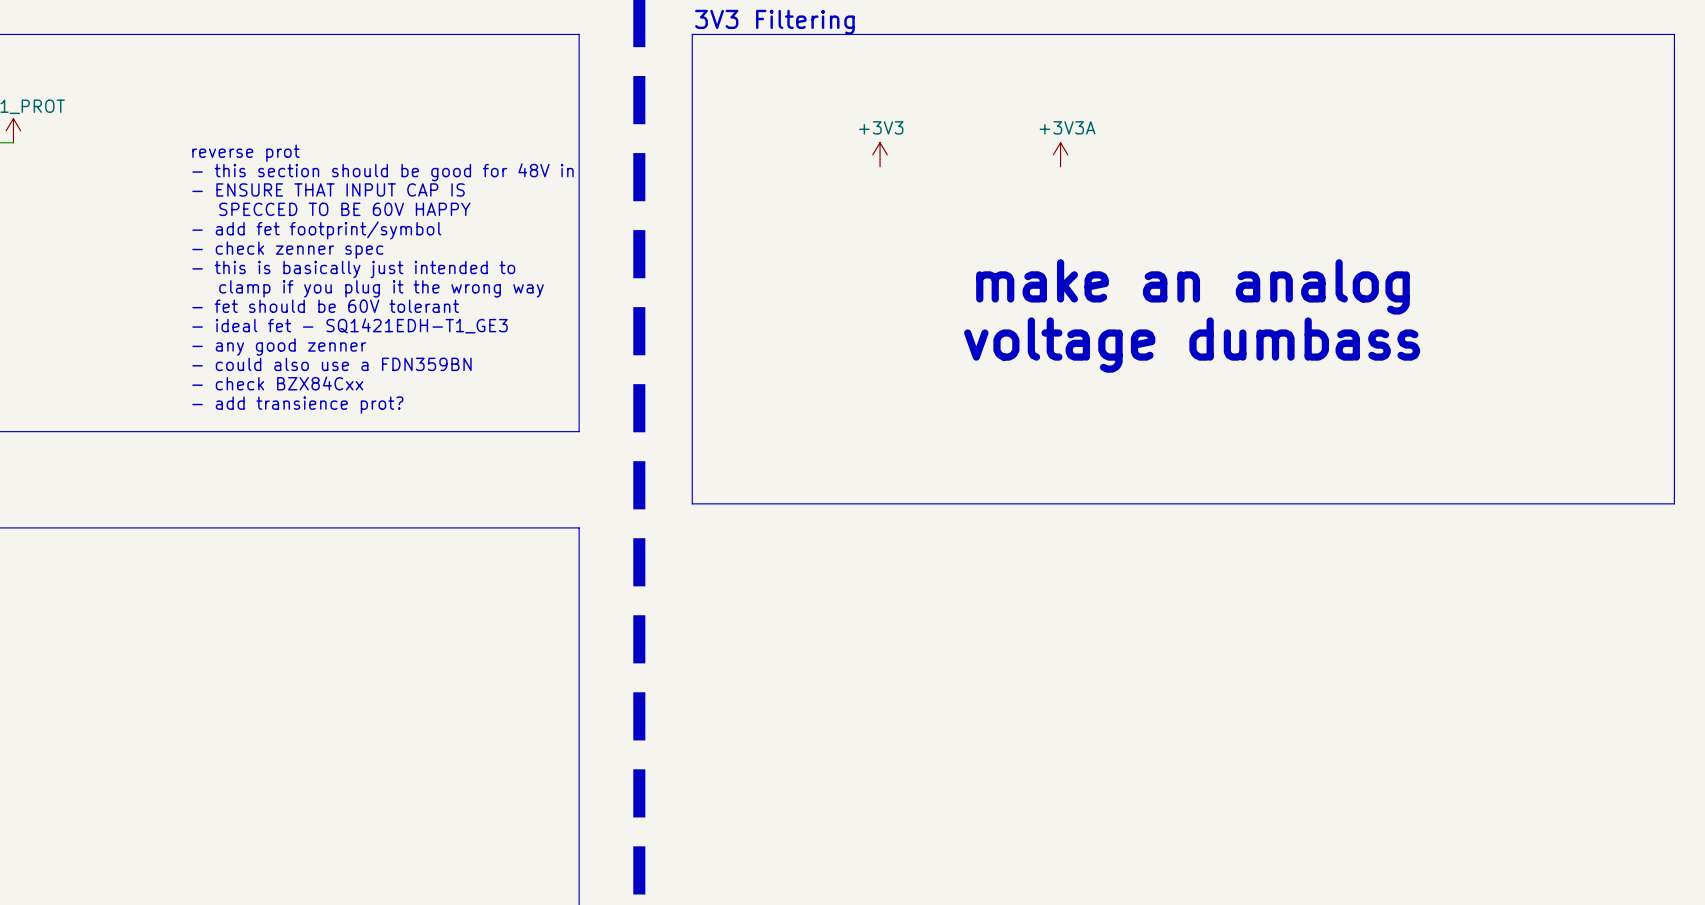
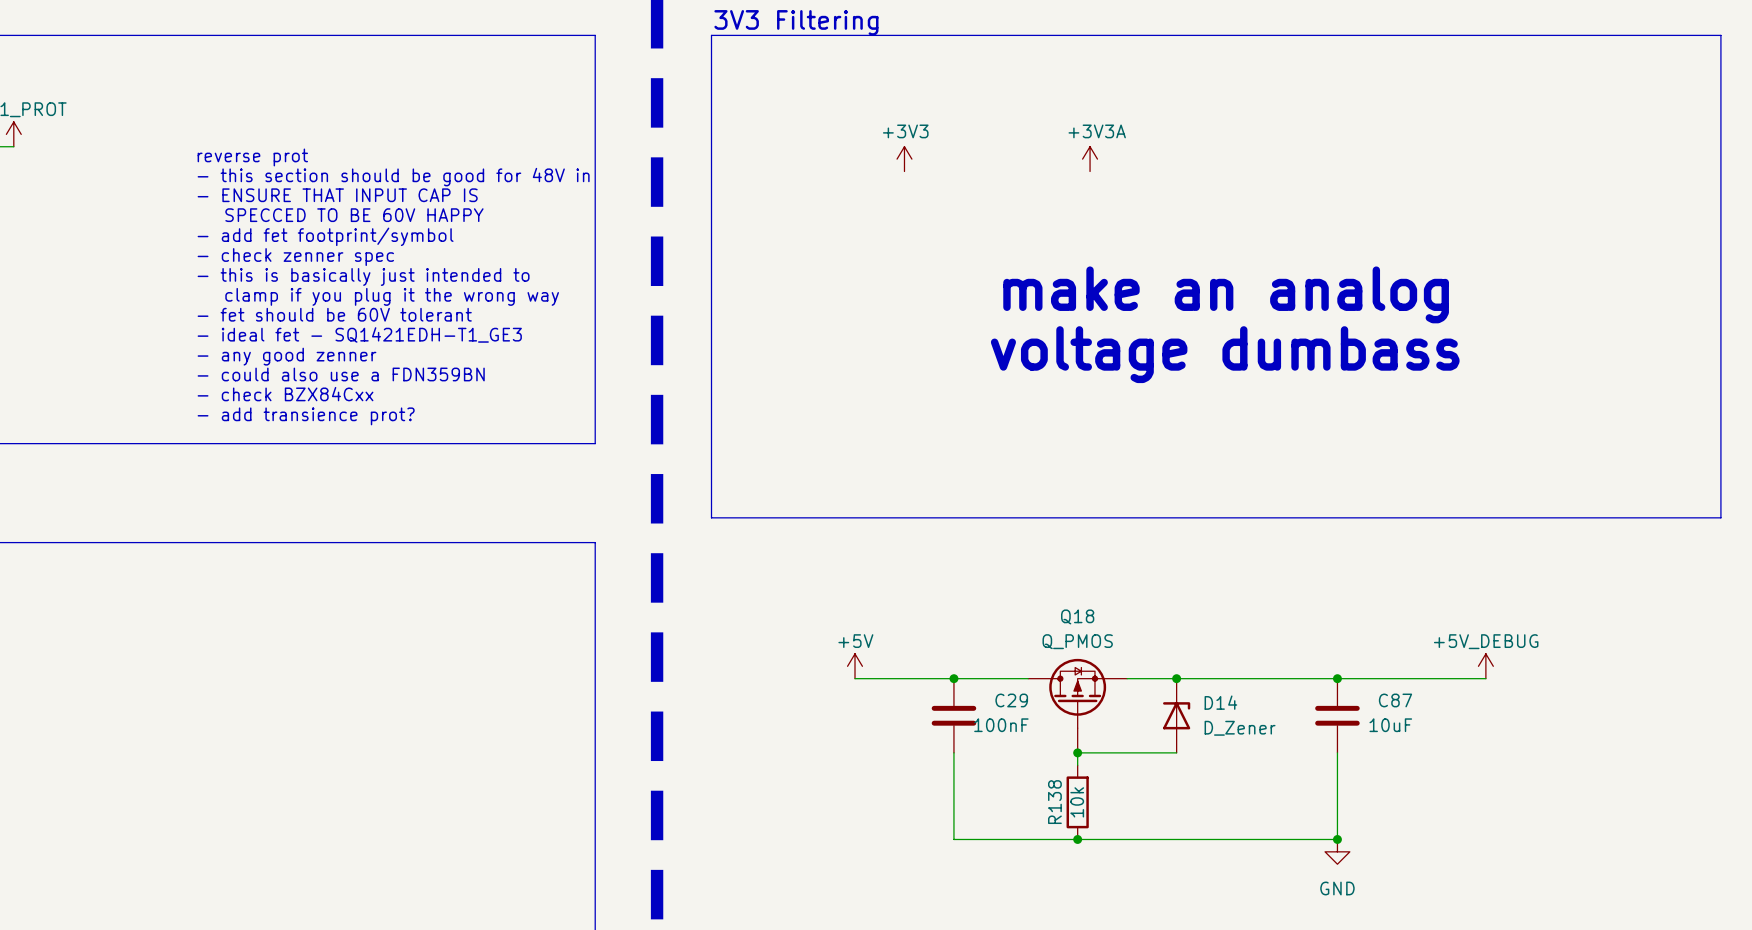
power symbol: none -> +5V (855, 666)
power symbol: none -> +5V_DEBUG (1485, 666)
wire: none -> (855, 678) (1028, 678)
junction: none -> (953, 678)
wire: none -> (1127, 678) (1485, 678)
junction: none -> (1176, 678)
junction: none -> (1337, 678)
Q18: none -> Q_PMOS (1077, 705)
C29: none -> 100nF (953, 715)
D14: none -> D_Zener (1176, 715)
C87: none -> 10uF (1337, 715)
wire: none -> (953, 752) (953, 839) (1337, 839) (1337, 752)
junction: none -> (1077, 752)
wire: none -> (1176, 752) (1077, 752) (1077, 765)
R138: none -> 10k (1077, 802)
junction: none -> (1077, 839)
junction: none -> (1337, 839)
power symbol: none -> GND (1337, 851)

